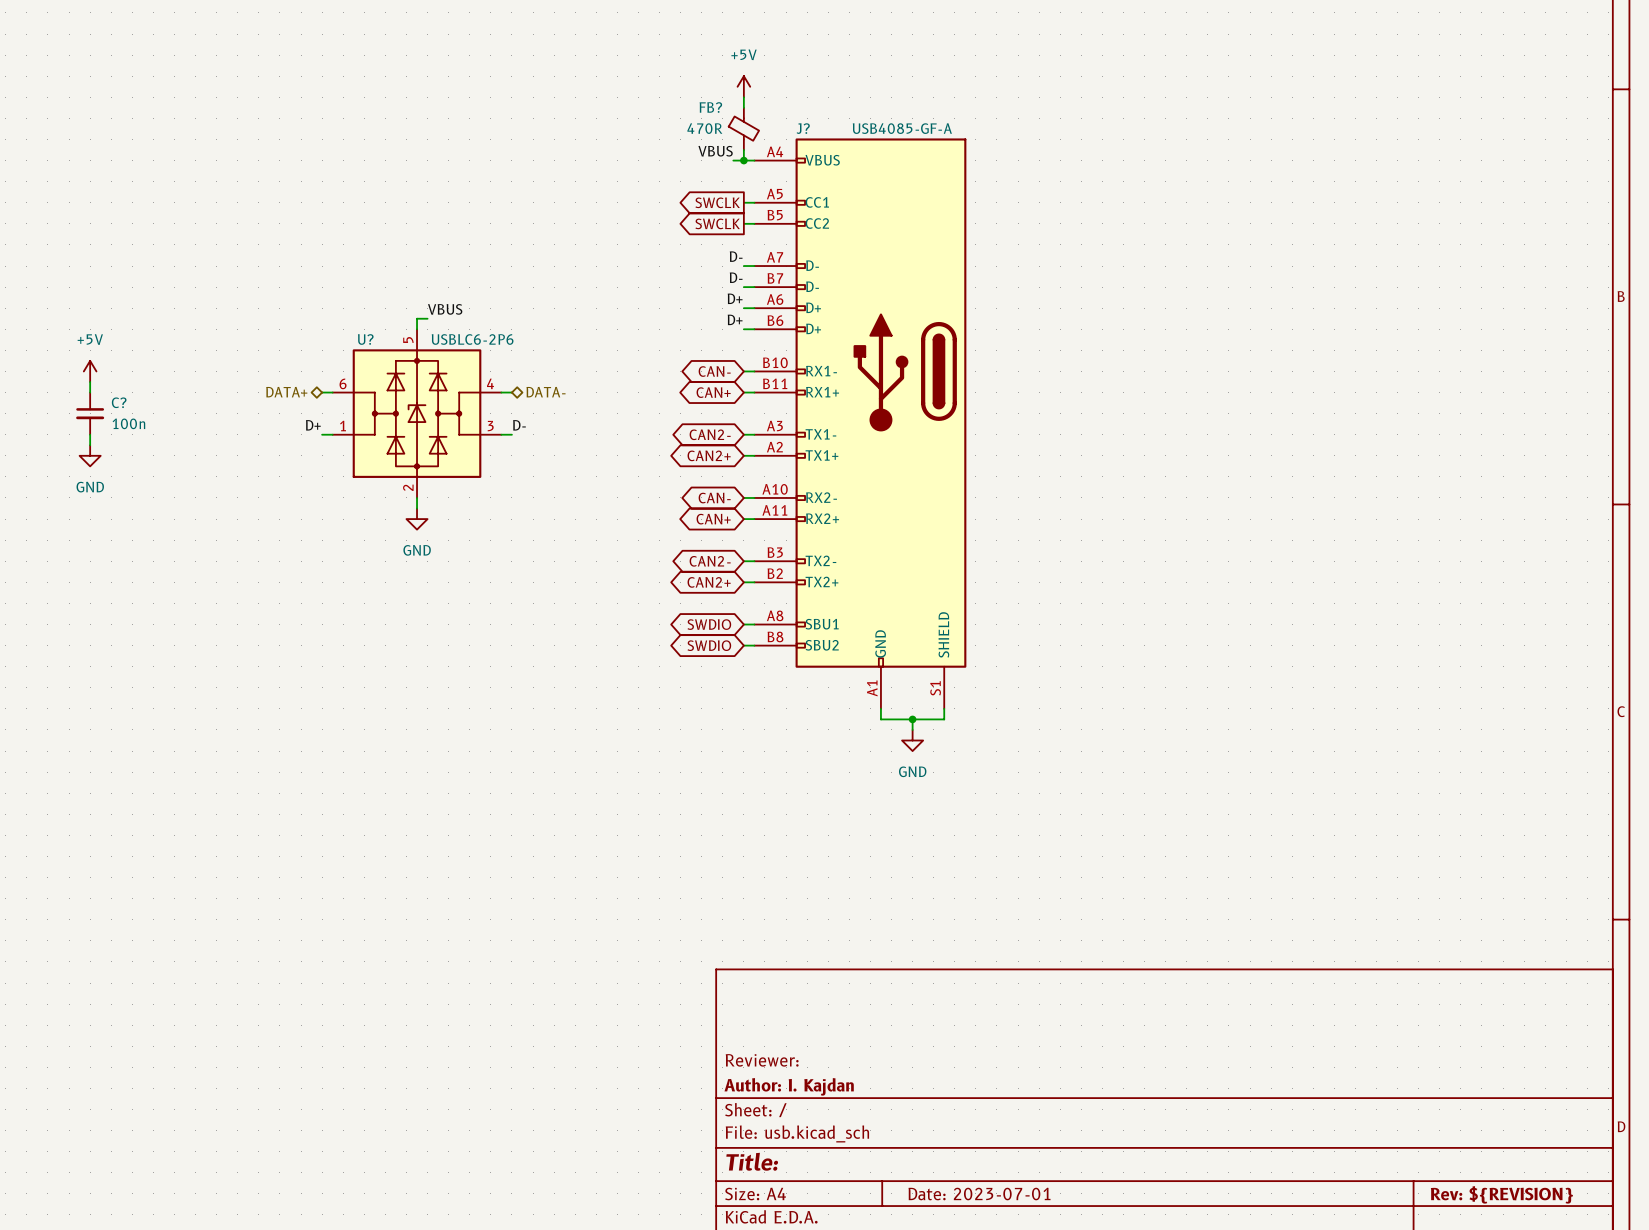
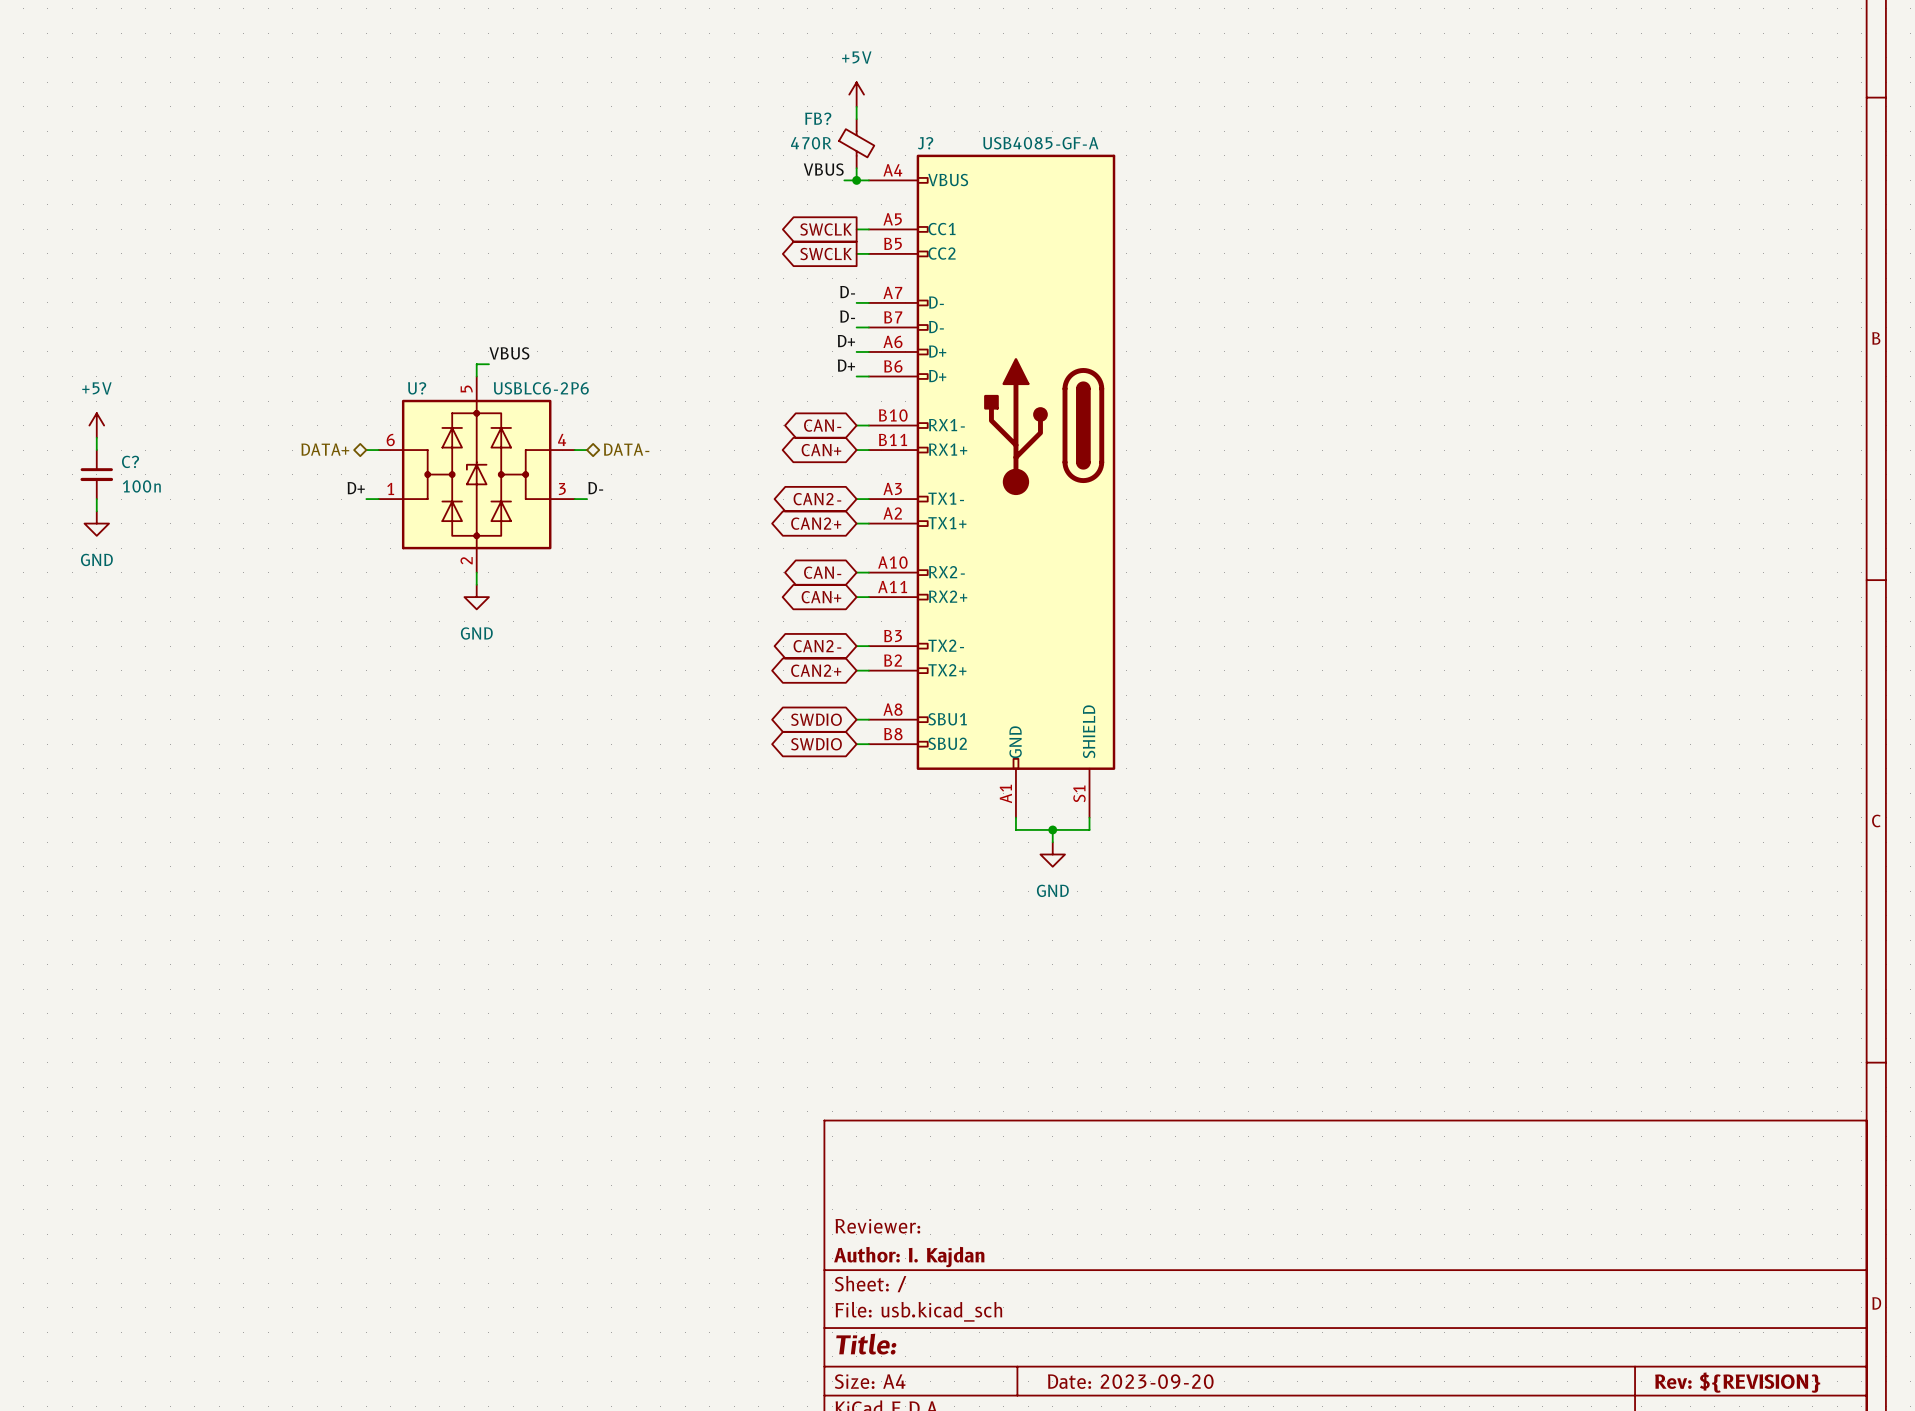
title block: Date: 2023-07-01 (979, 1194) -> Date: 2023-09-20 (1130, 1381)

